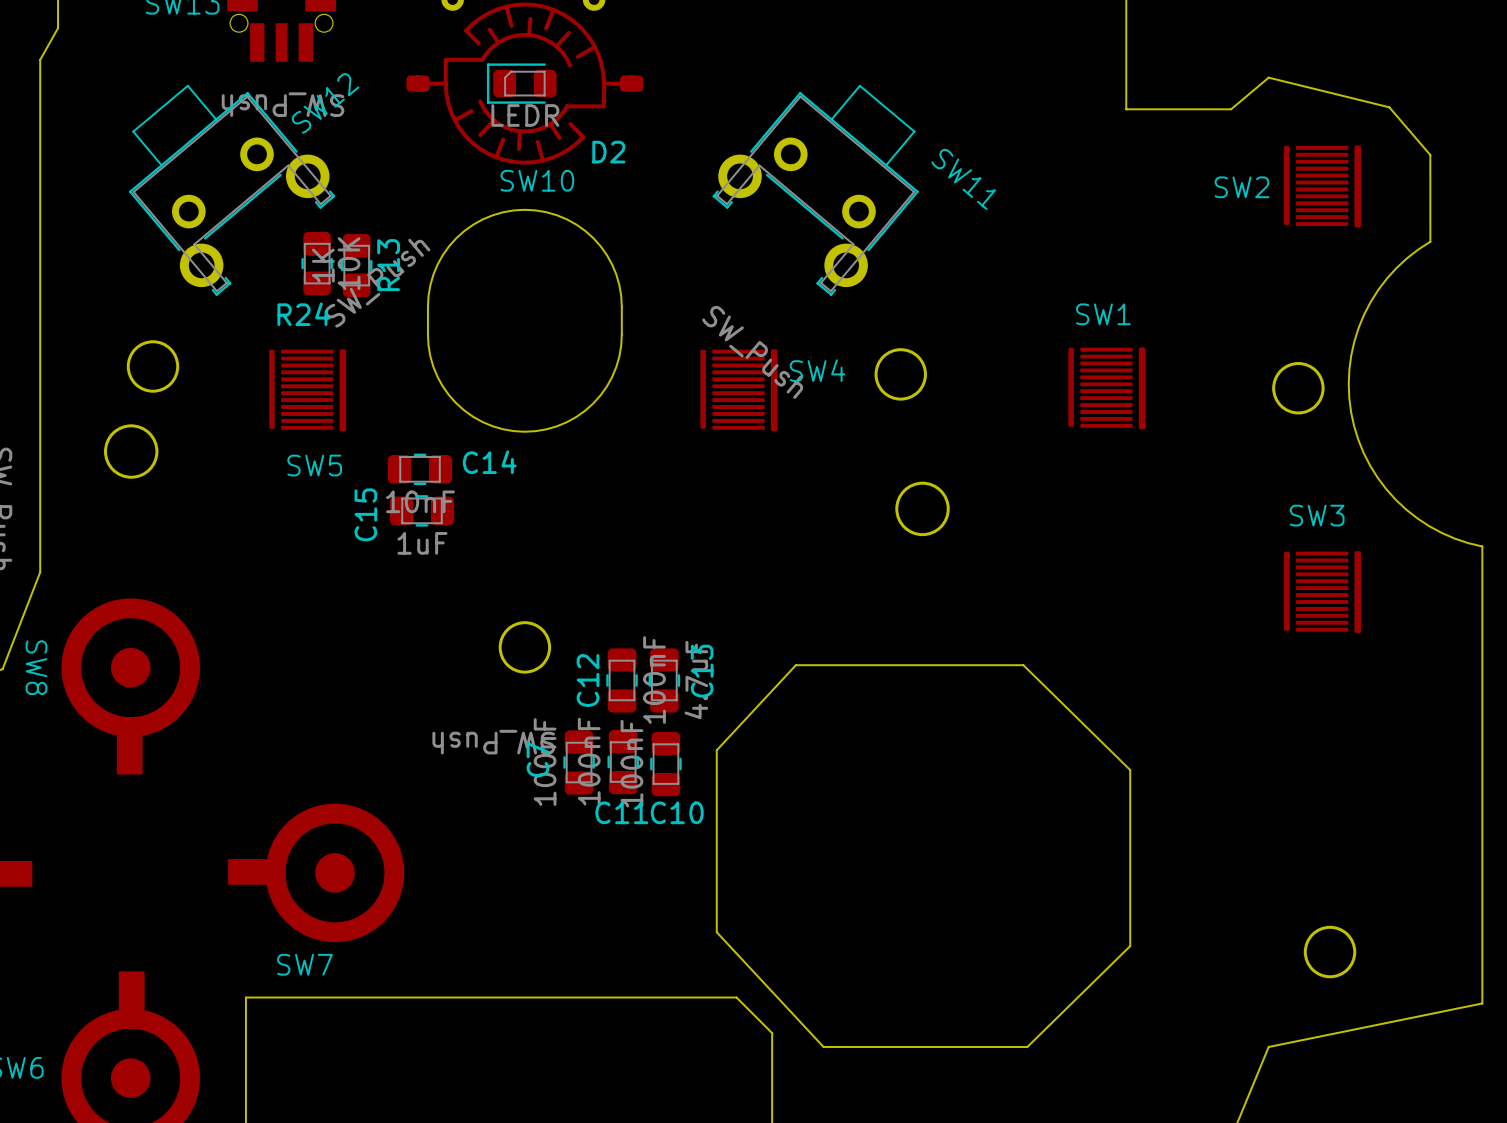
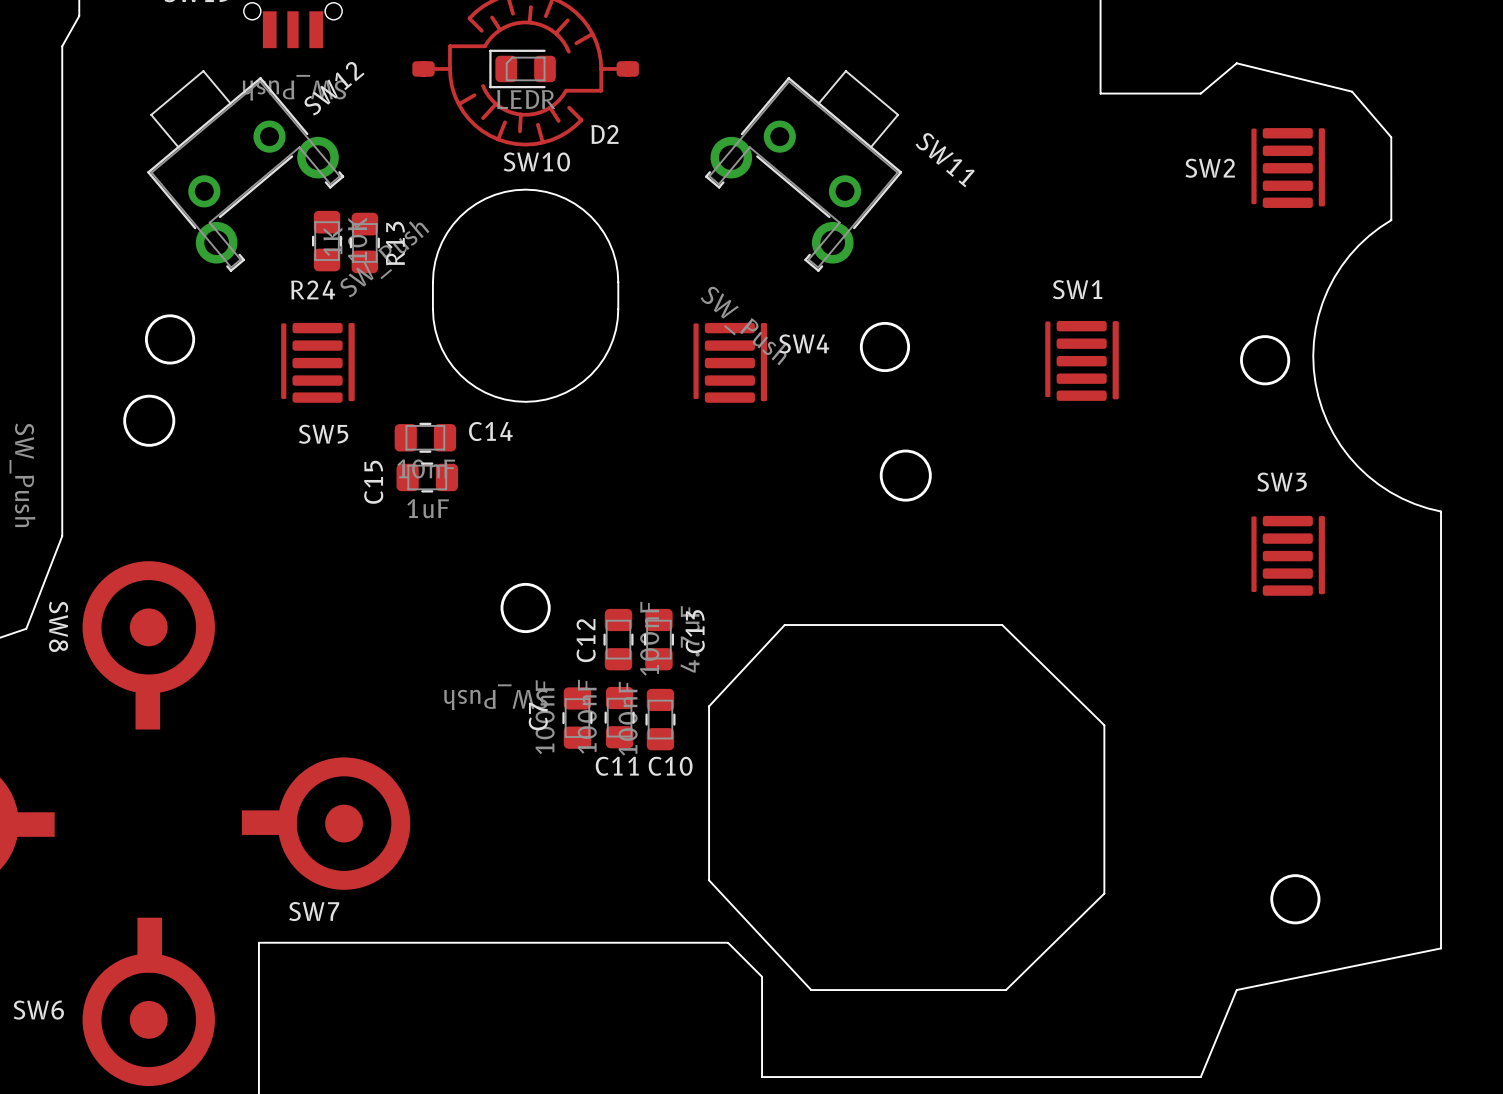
SW2 footprint: [1284, 145, 1361, 228] -> [1251, 128, 1325, 208]
SW1 footprint: [1068, 347, 1146, 430] -> [1045, 320, 1119, 401]
SW5 footprint: [269, 349, 347, 432] -> [281, 322, 355, 403]
SW4 footprint: [700, 349, 778, 432] -> [693, 322, 768, 403]
SW3 footprint: [1284, 551, 1361, 634] -> [1251, 515, 1325, 596]

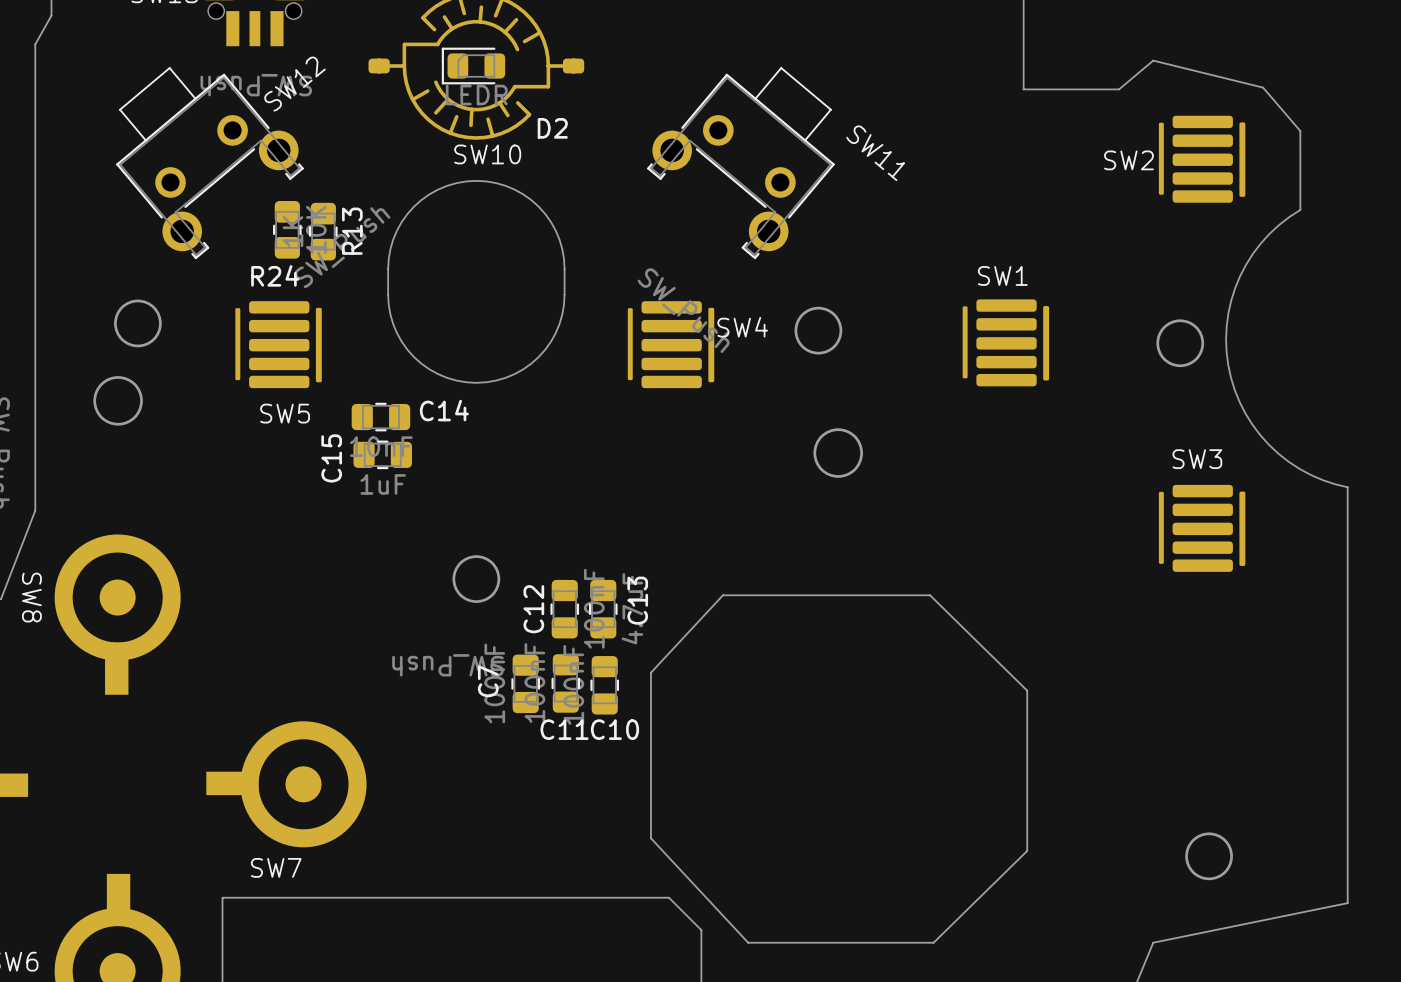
SW2 footprint: [1251, 128, 1325, 208] -> [1158, 115, 1246, 203]
SW1 footprint: [1045, 320, 1119, 401] -> [962, 299, 1050, 387]
SW5 footprint: [281, 322, 355, 403] -> [235, 301, 322, 389]
SW4 footprint: [693, 322, 768, 403] -> [627, 301, 715, 389]
SW3 footprint: [1251, 515, 1325, 596] -> [1158, 484, 1246, 572]

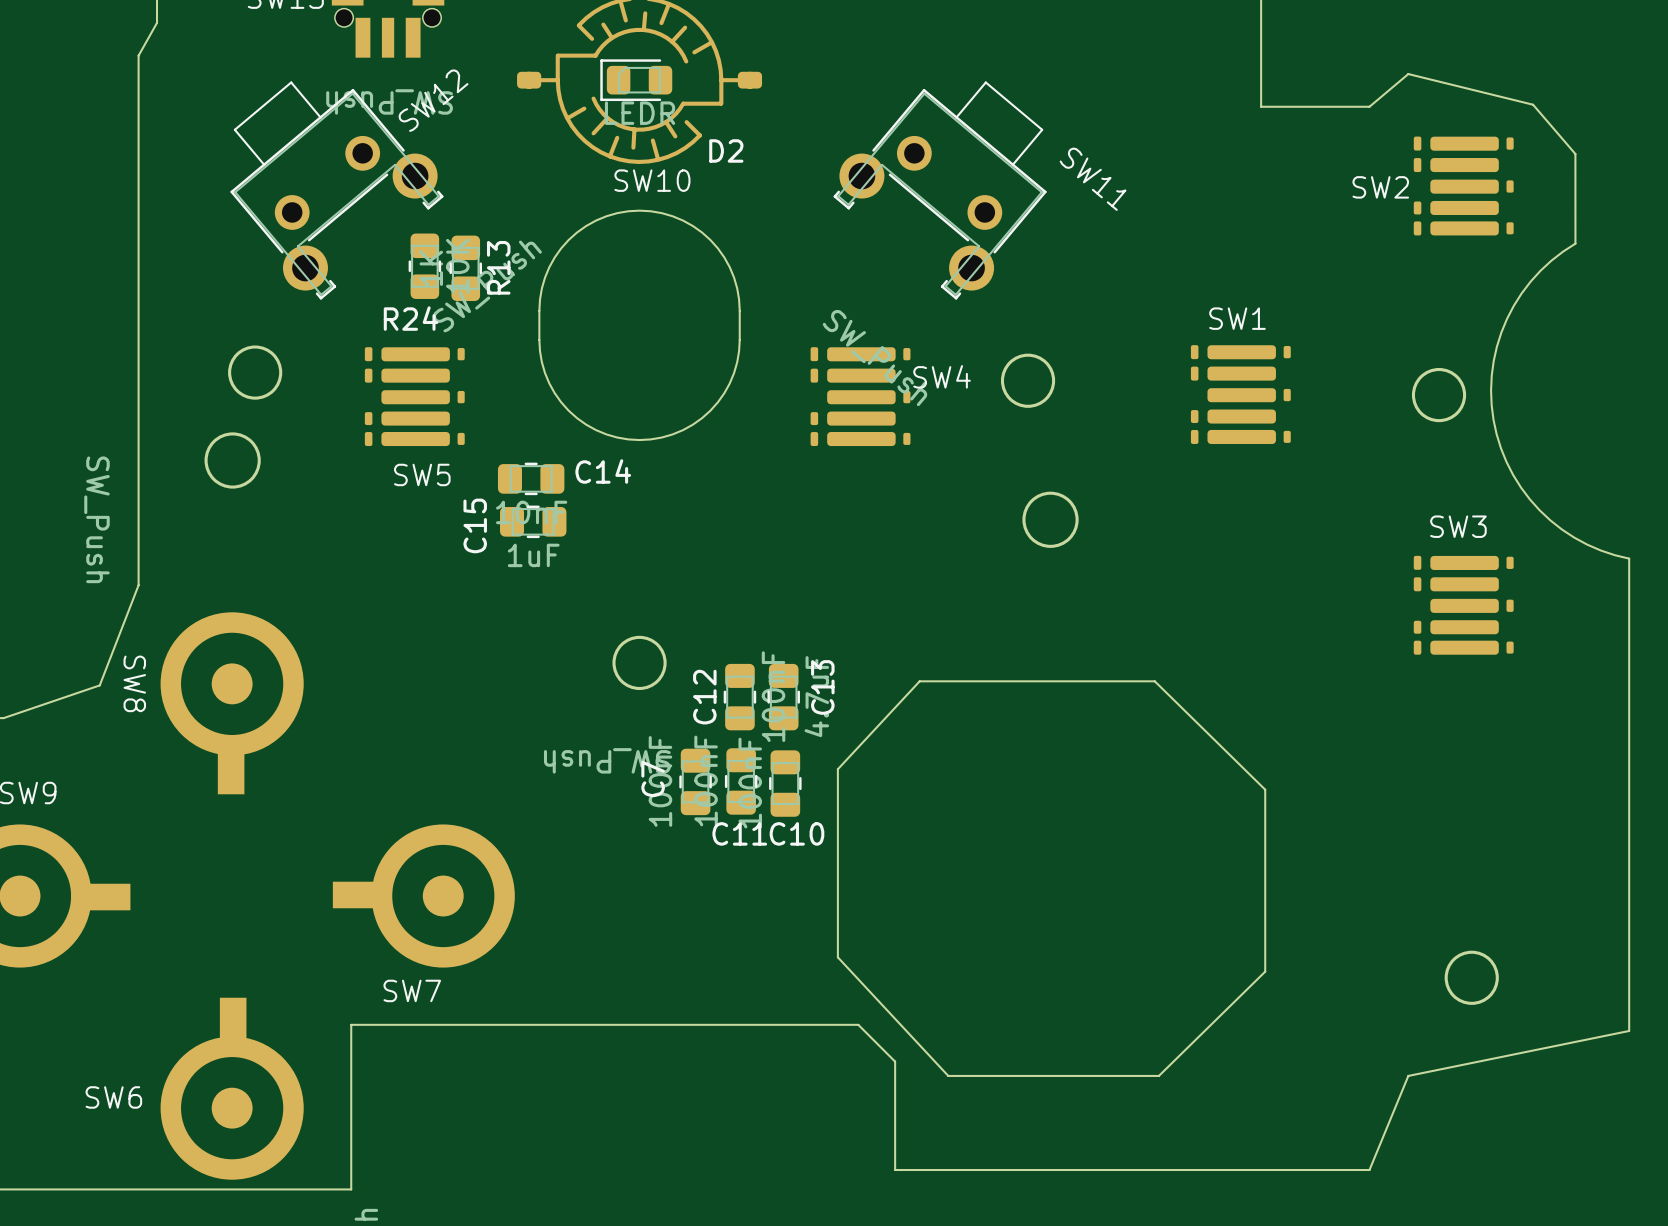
SW2 footprint: [1158, 115, 1246, 203] -> [1413, 136, 1514, 236]
SW1 footprint: [962, 299, 1050, 387] -> [1190, 345, 1291, 445]
SW5 footprint: [235, 301, 322, 389] -> [364, 347, 465, 447]
SW4 footprint: [627, 301, 715, 389] -> [810, 347, 911, 447]
SW3 footprint: [1158, 484, 1246, 572] -> [1413, 555, 1514, 655]

